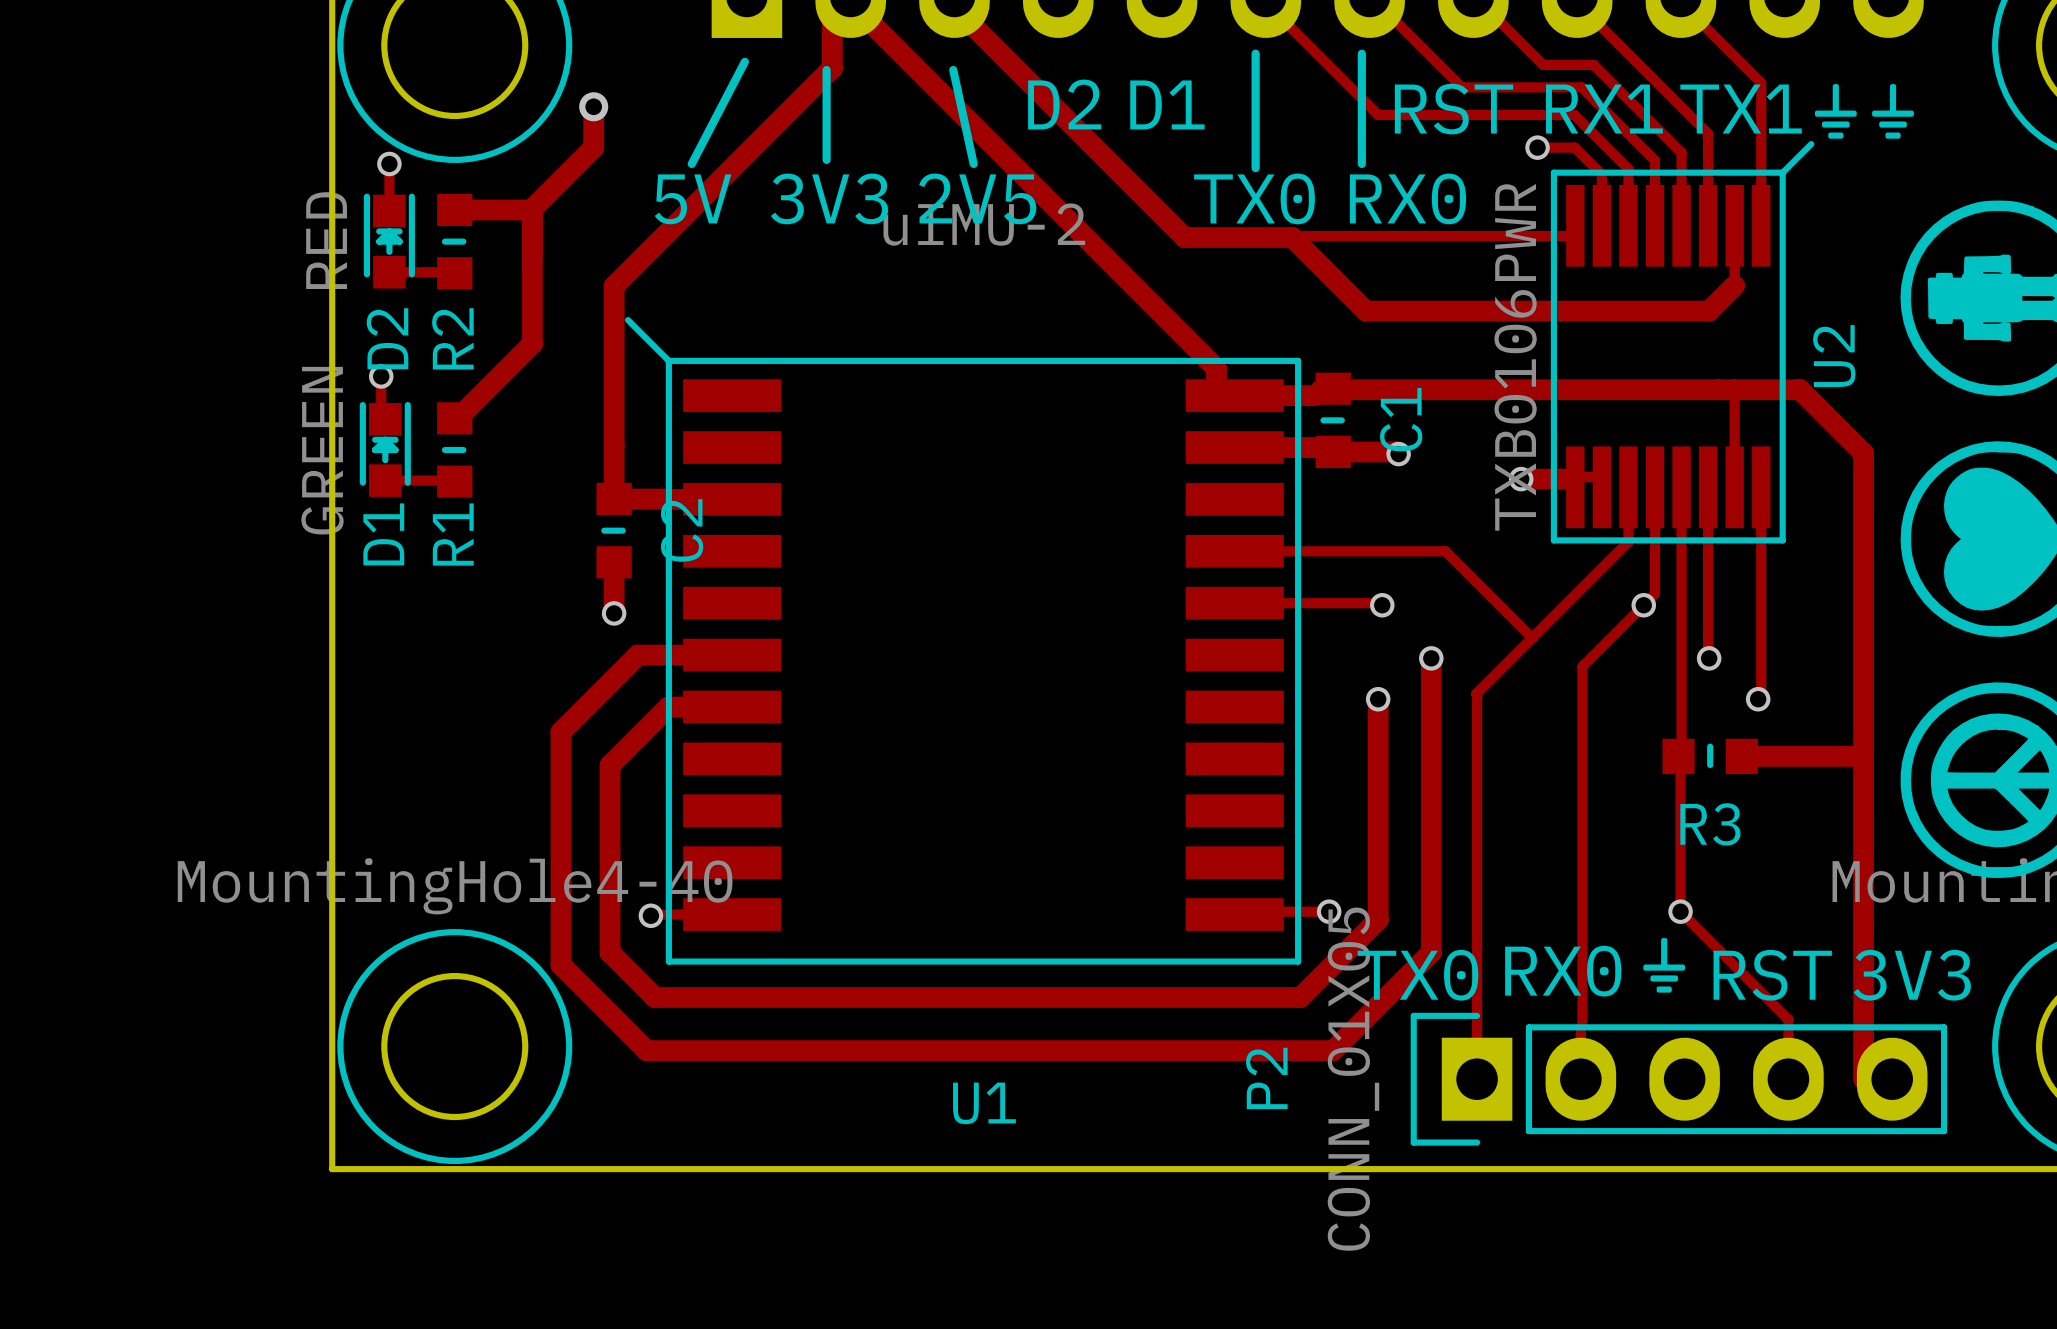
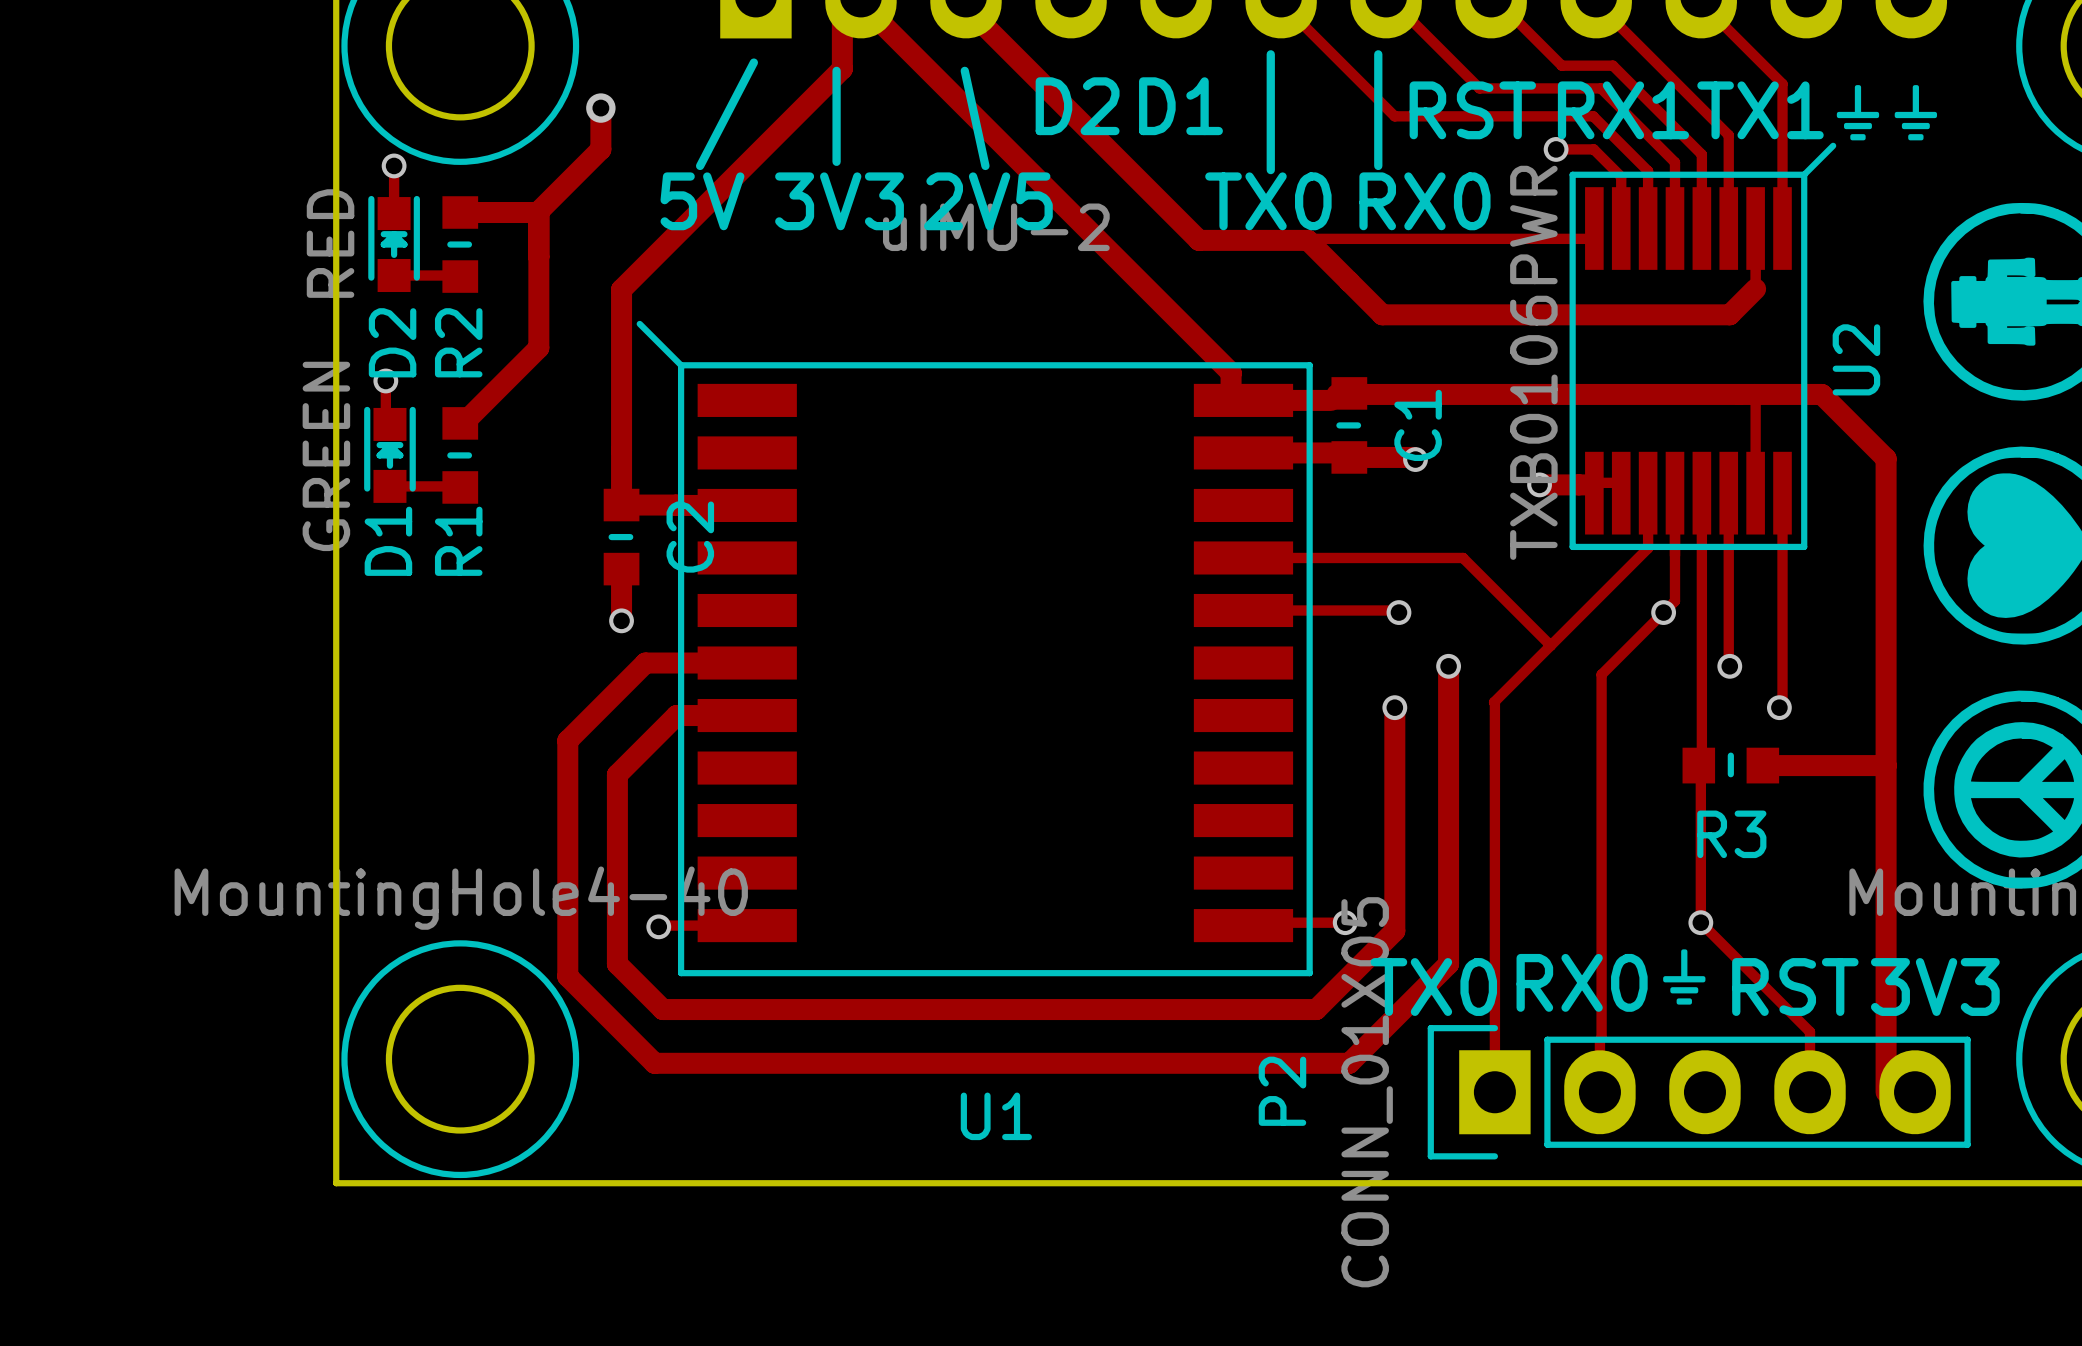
U1 footprint: [624, 316, 1302, 965] -> [636, 320, 1313, 977]

